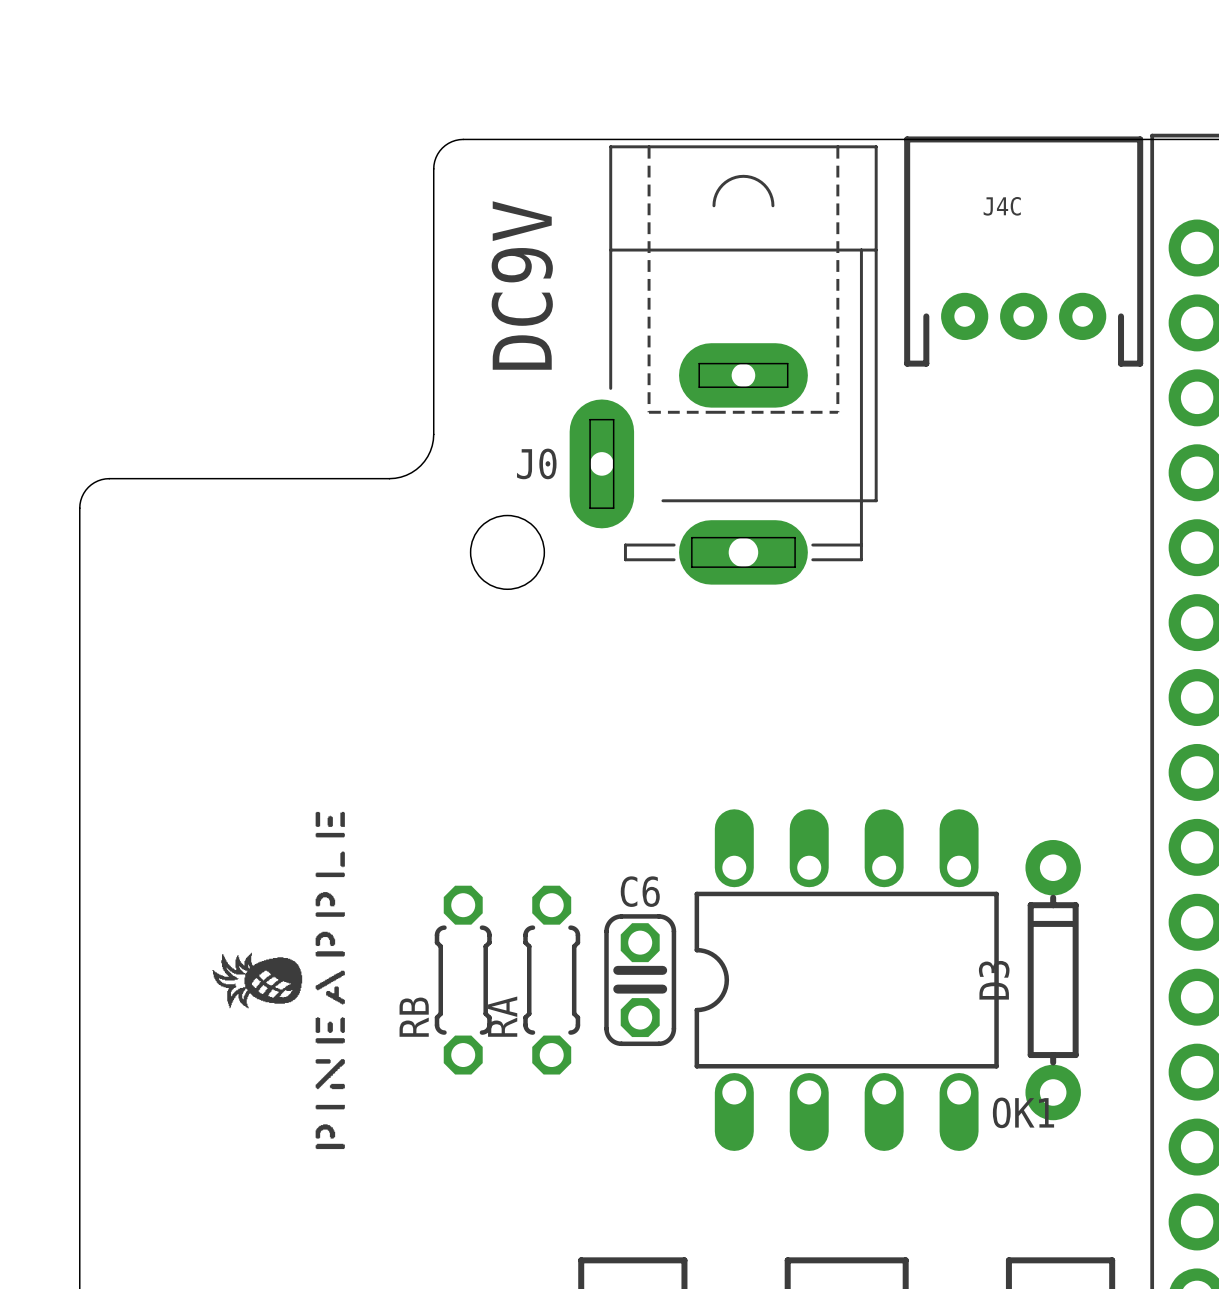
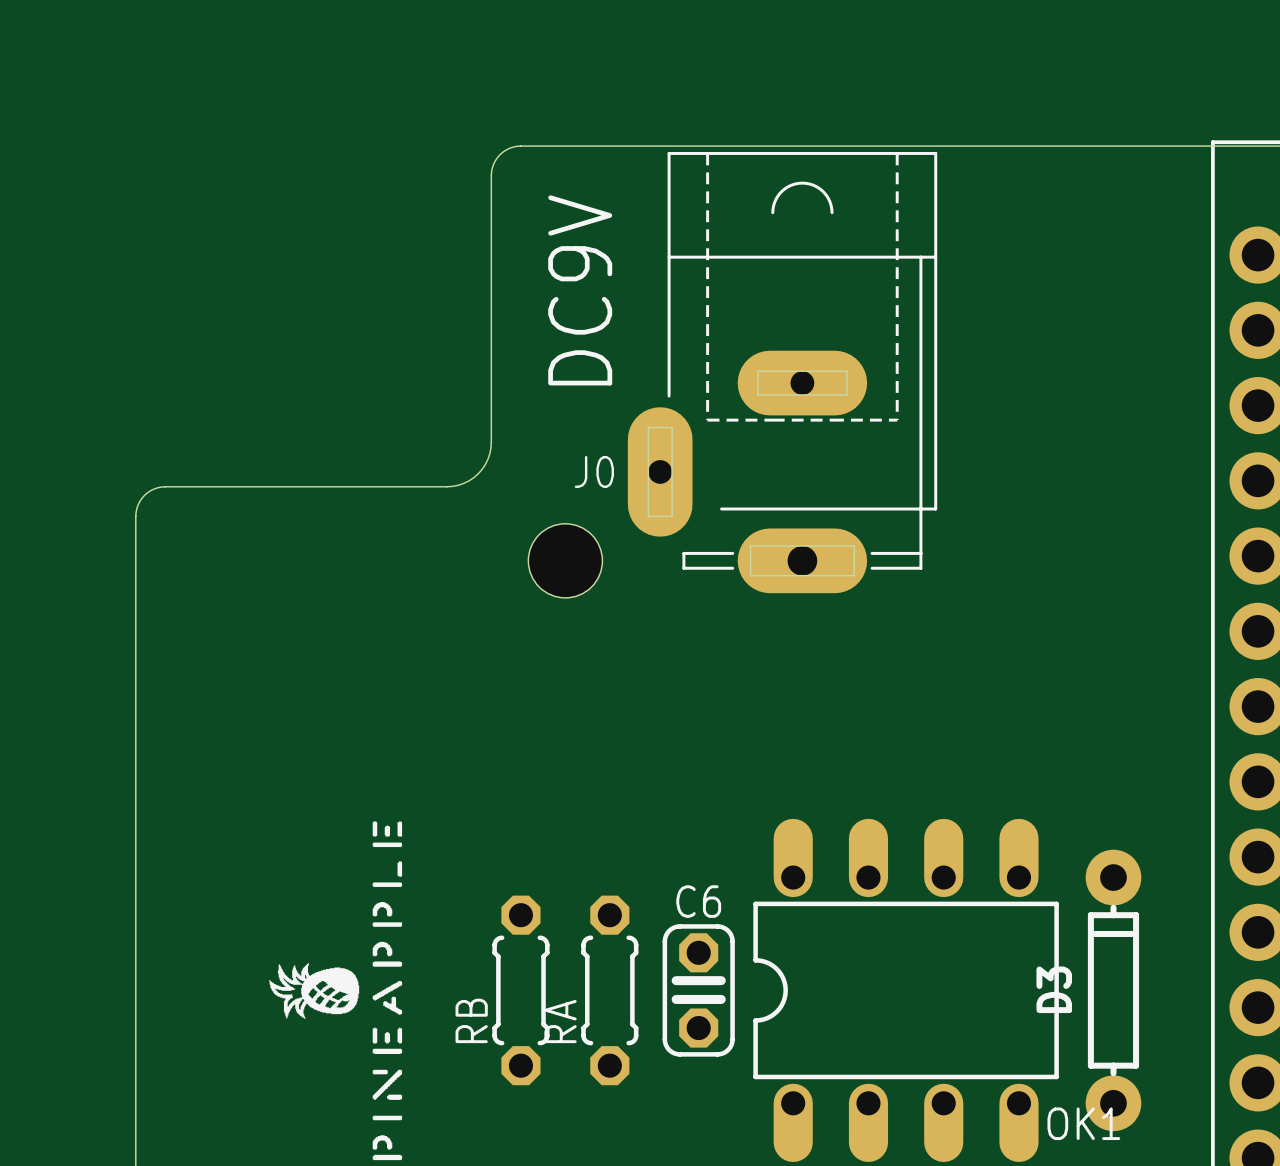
J4C: (1023, 251) -> none

